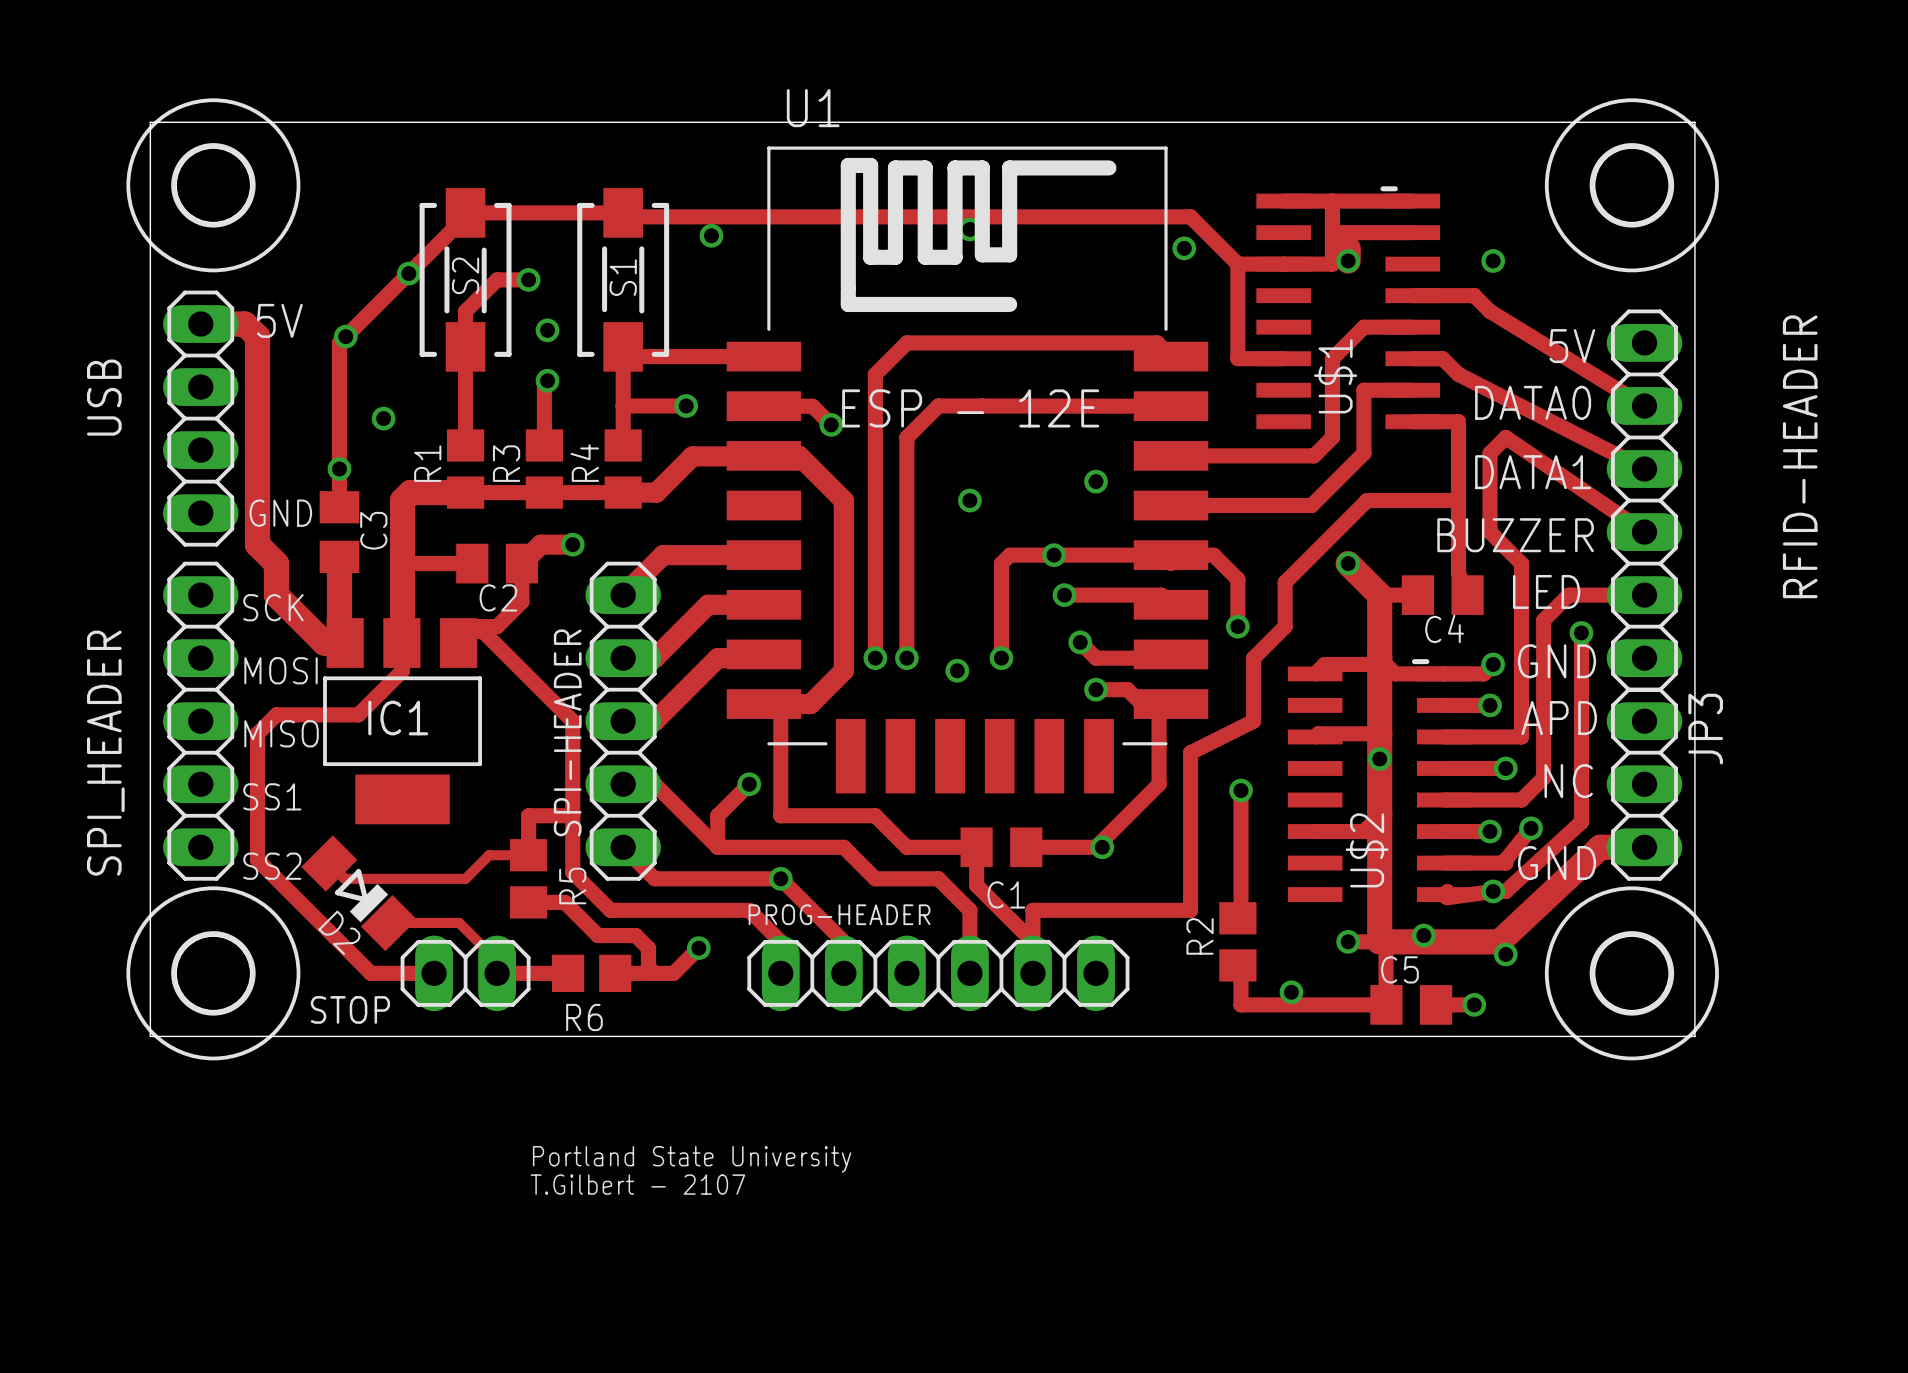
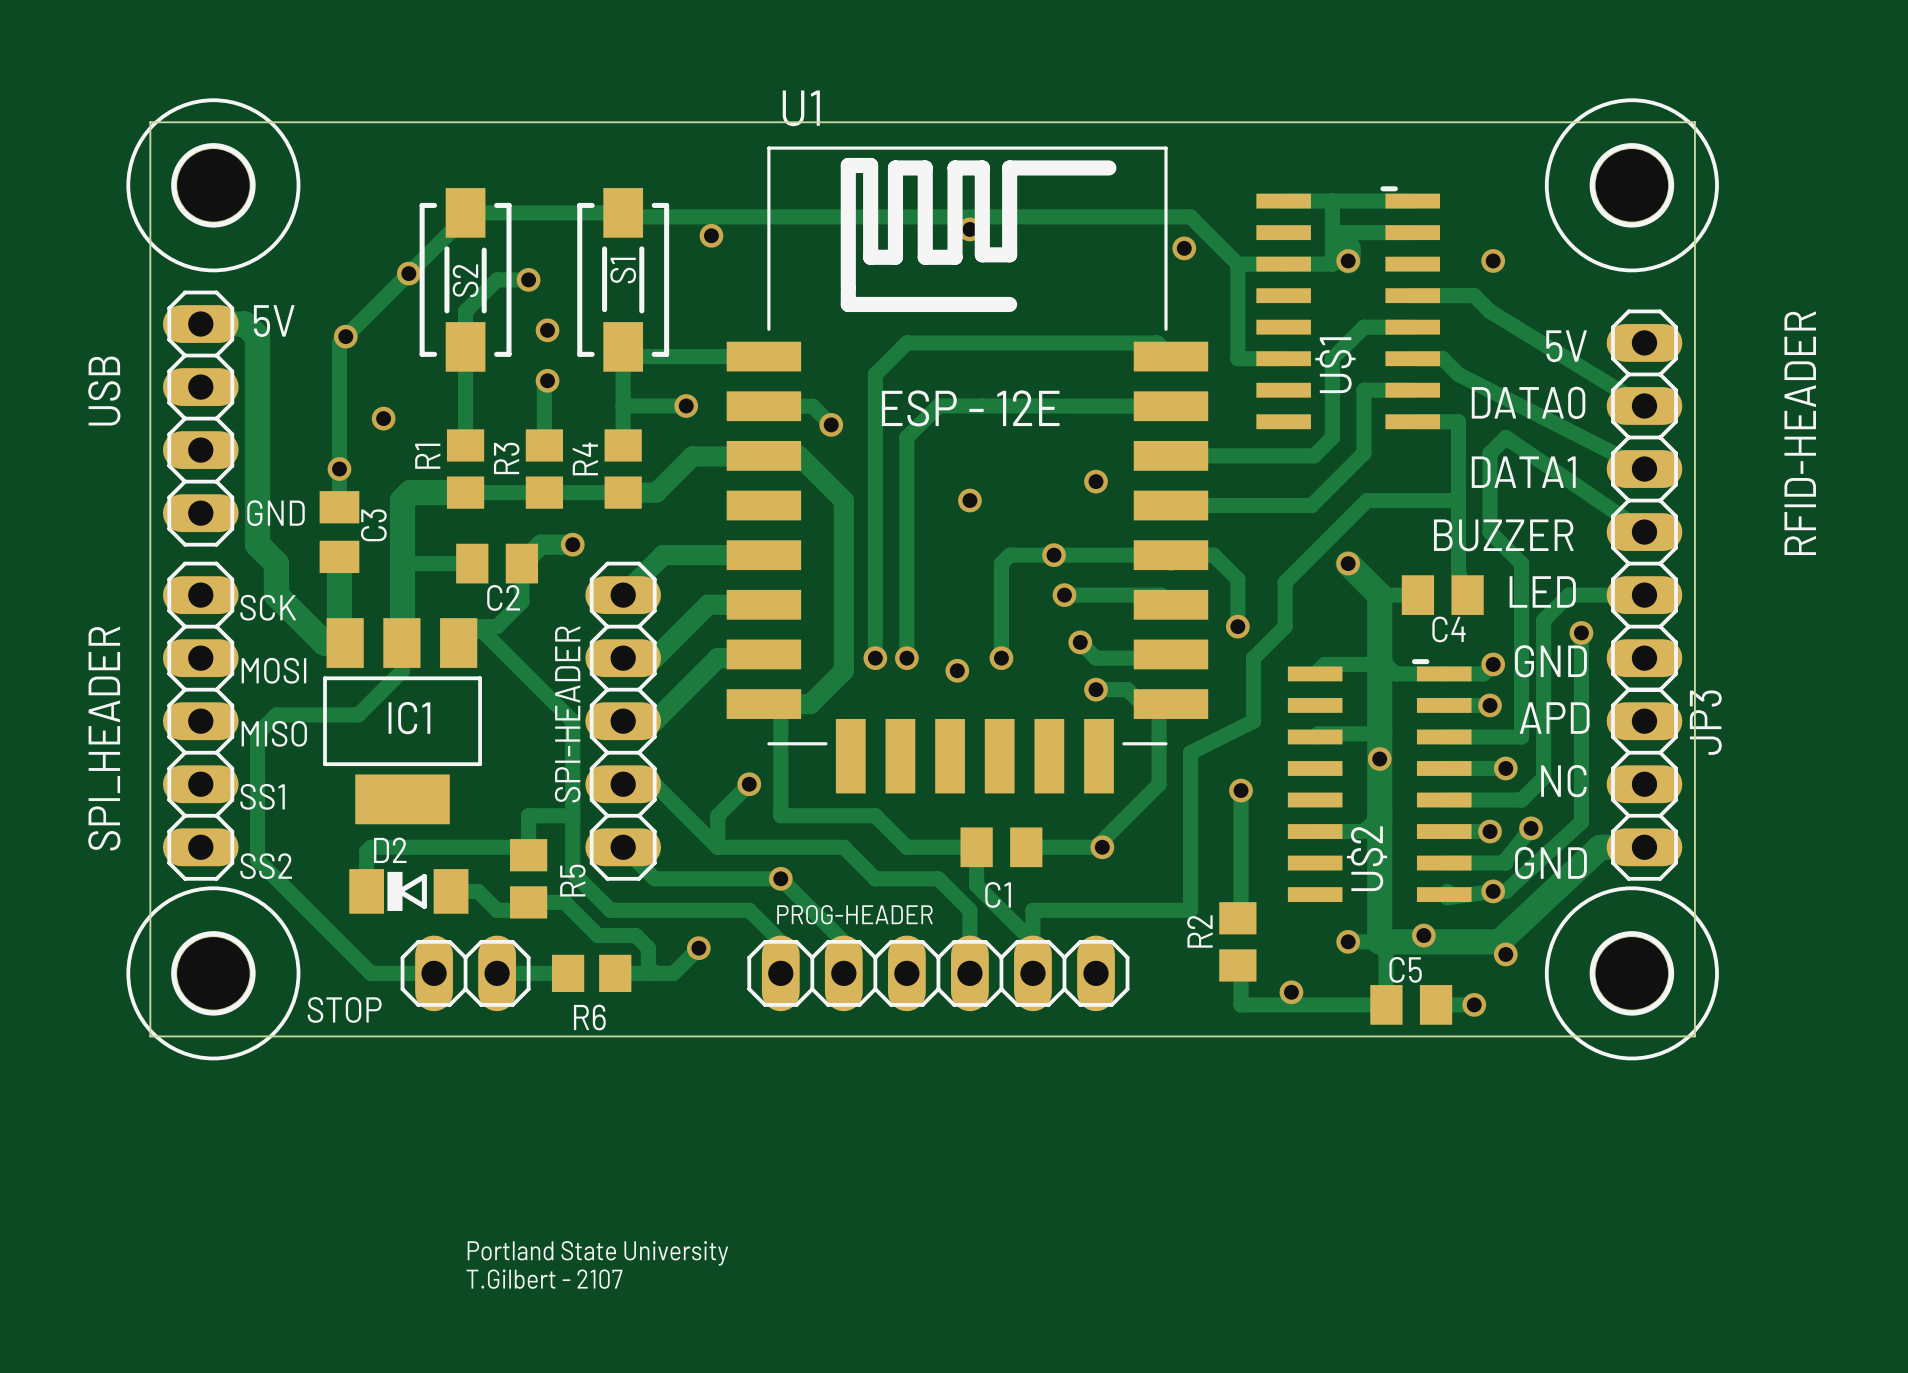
track: (528, 855) (489, 855) (465, 878) (344, 878) (329, 863) -> (528, 855) (520, 847) (371, 847) (366, 851) (366, 891)
track: none -> (451, 891) (478, 891) (497, 910) (520, 910)
D2 rotation: 0° (359, 893) -> 135° clockwise (408, 891)
track: (389, 922) (459, 922) (497, 960) (497, 973) -> none
text position: Portland State University (692, 1159) -> Portland State University (597, 1253)
text position: T.Gilbert - 2107 (637, 1184) -> T.Gilbert - 2107 (544, 1279)

